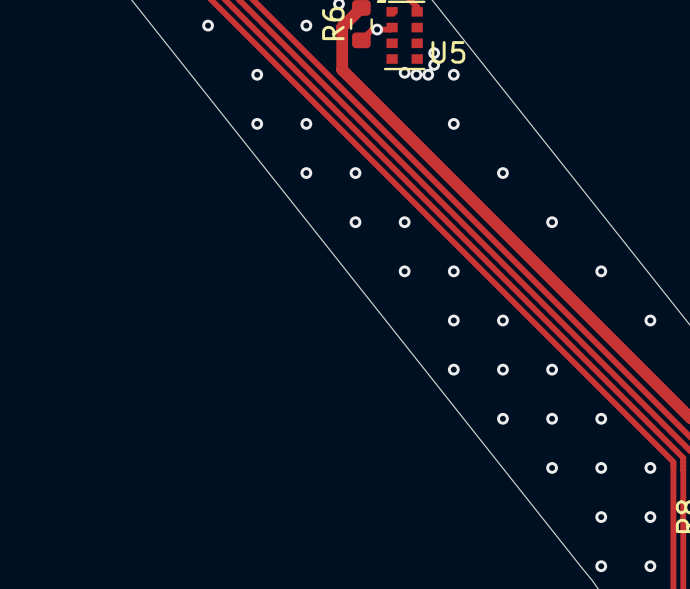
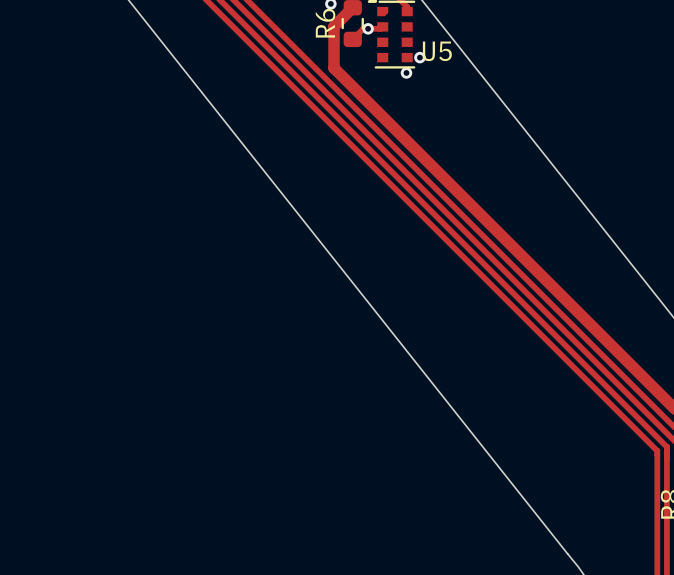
via: (208, 25) -> none
via: (306, 25) -> none
via: (434, 53) -> none
via: none -> (419, 57)
via: (434, 64) -> none
via: (404, 72) -> none
via: (257, 74) -> none
via: (428, 74) -> none
via: (453, 74) -> none
via: (257, 123) -> none
via: (306, 123) -> none
via: (453, 123) -> none
via: (306, 173) -> none
via: (355, 173) -> none
via: (502, 173) -> none
via: (355, 222) -> none
via: (404, 222) -> none
via: (552, 222) -> none
via: (404, 271) -> none
via: (453, 271) -> none
via: (601, 271) -> none
via: (453, 320) -> none
via: (502, 320) -> none
via: (650, 320) -> none
via: (453, 369) -> none
via: (502, 369) -> none
via: (552, 369) -> none
via: (502, 418) -> none
via: (552, 418) -> none
via: (601, 418) -> none
via: (552, 467) -> none
via: (601, 467) -> none
via: (650, 467) -> none
via: (601, 517) -> none
via: (650, 517) -> none
via: (601, 566) -> none
via: (650, 566) -> none

